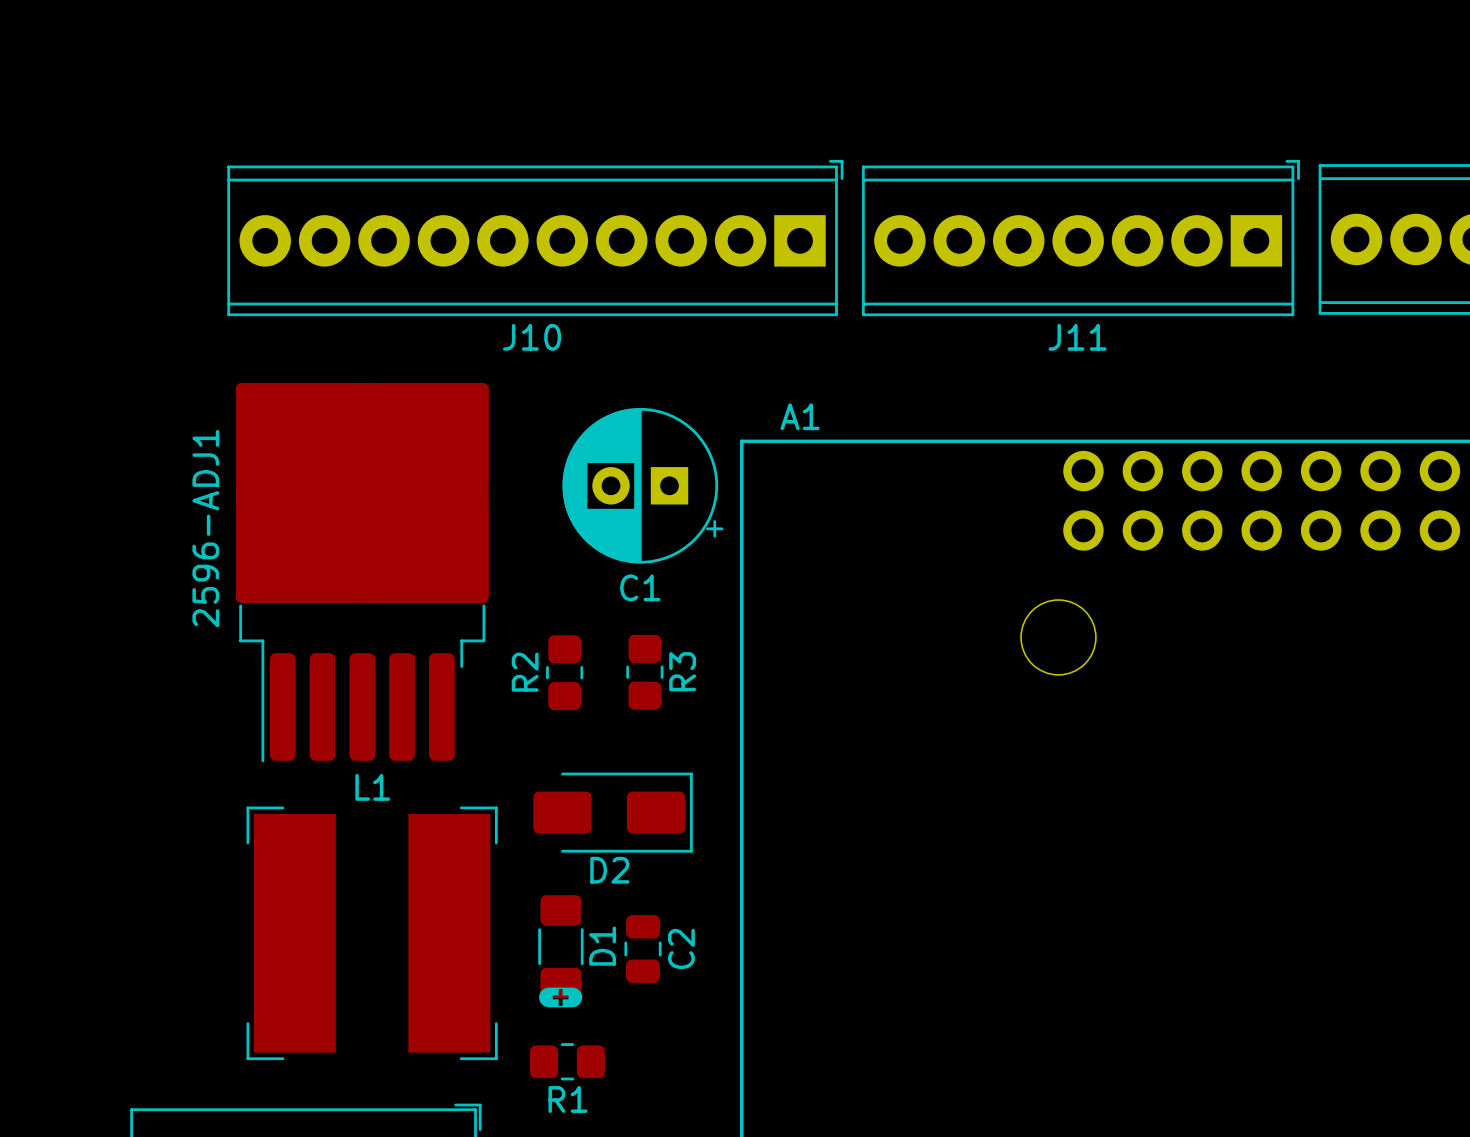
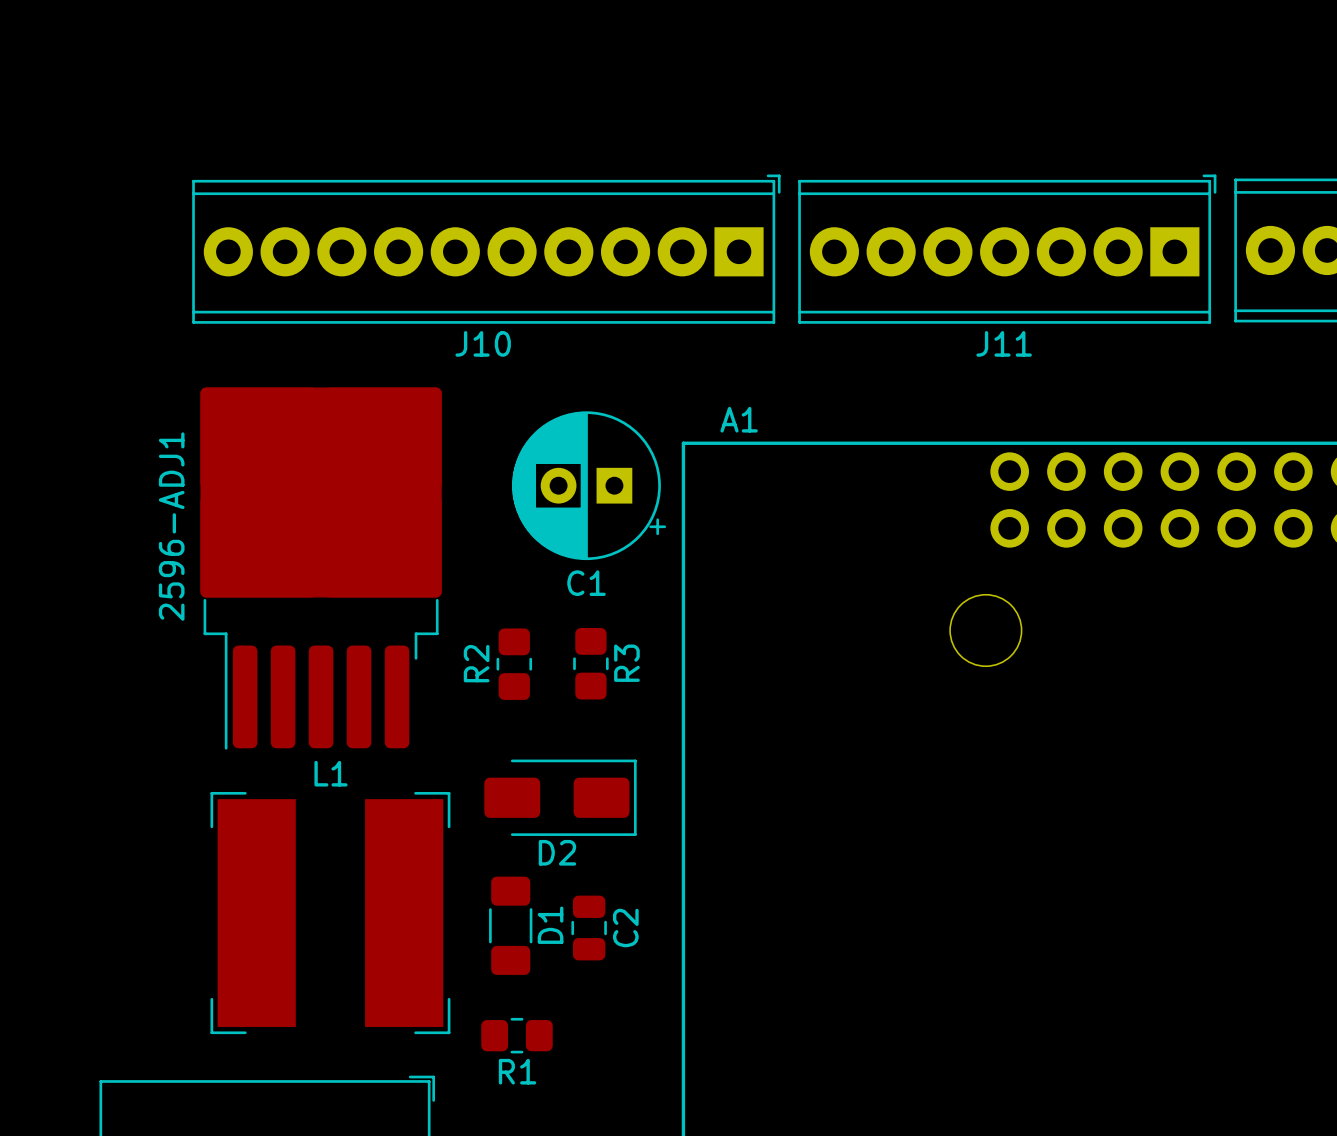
drawing: [539, 987, 583, 1008] -> none

